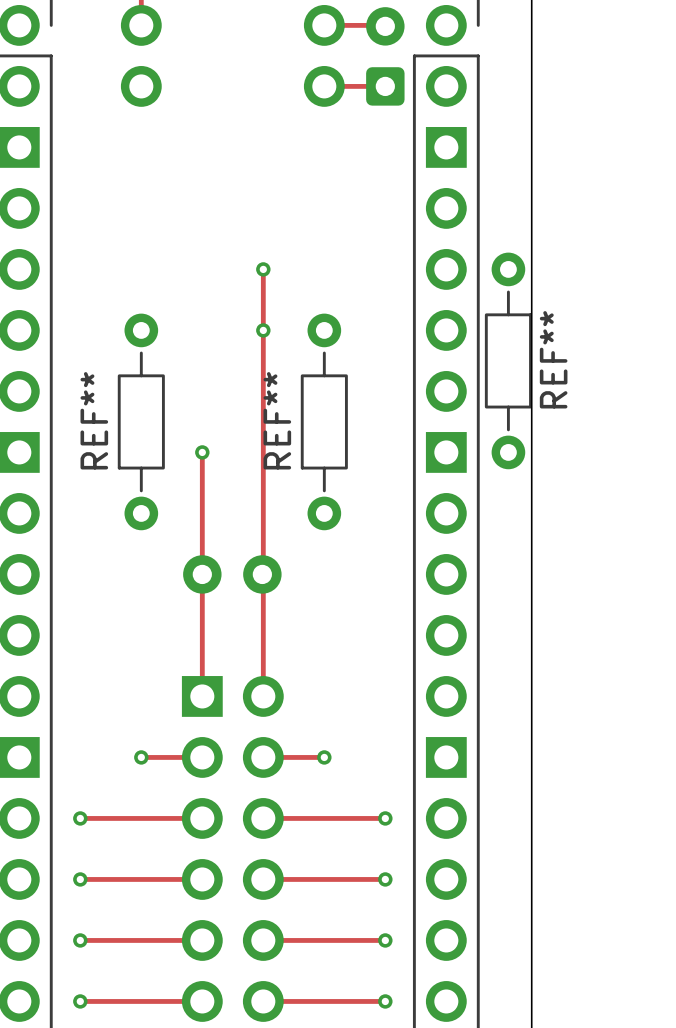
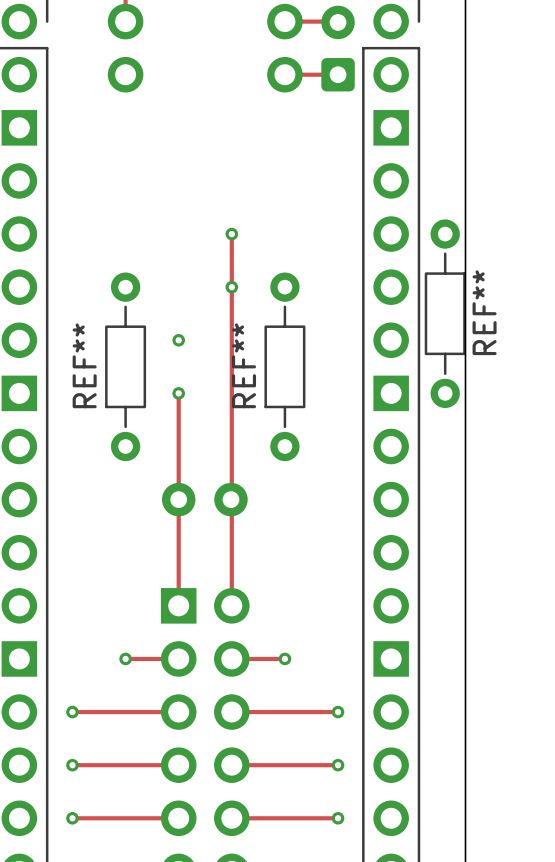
via: none -> (178, 340)

